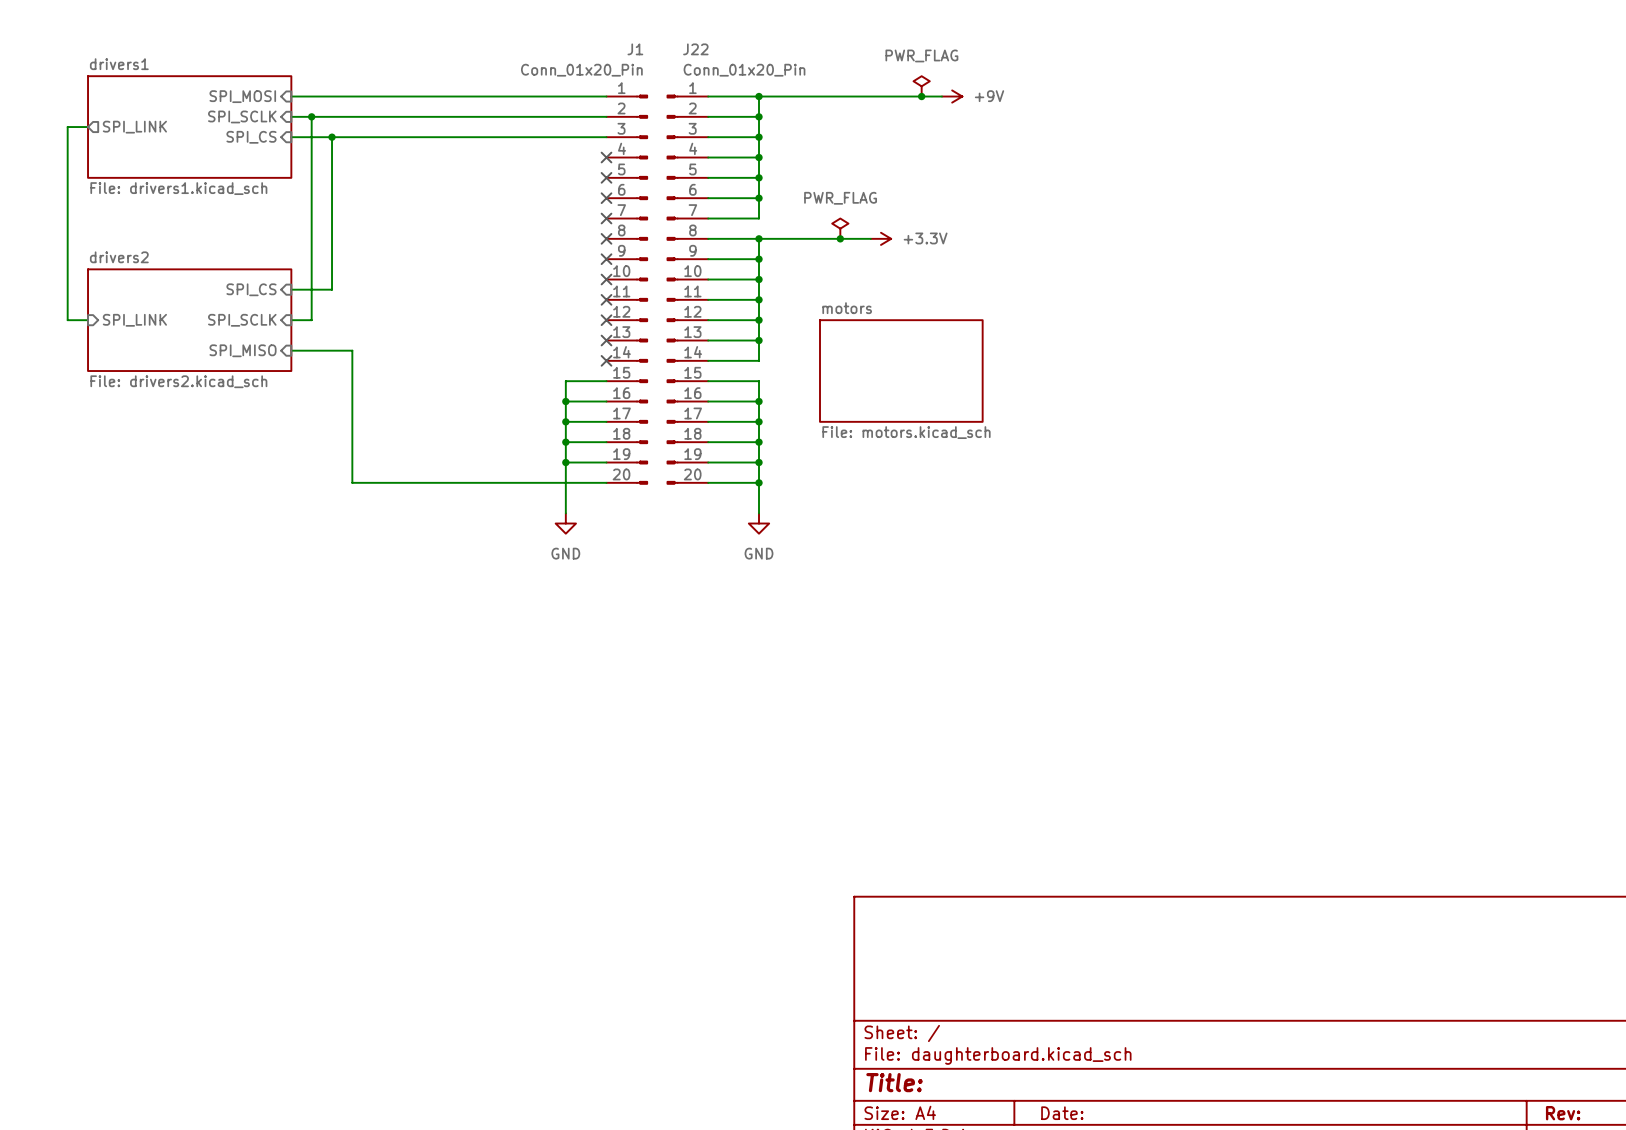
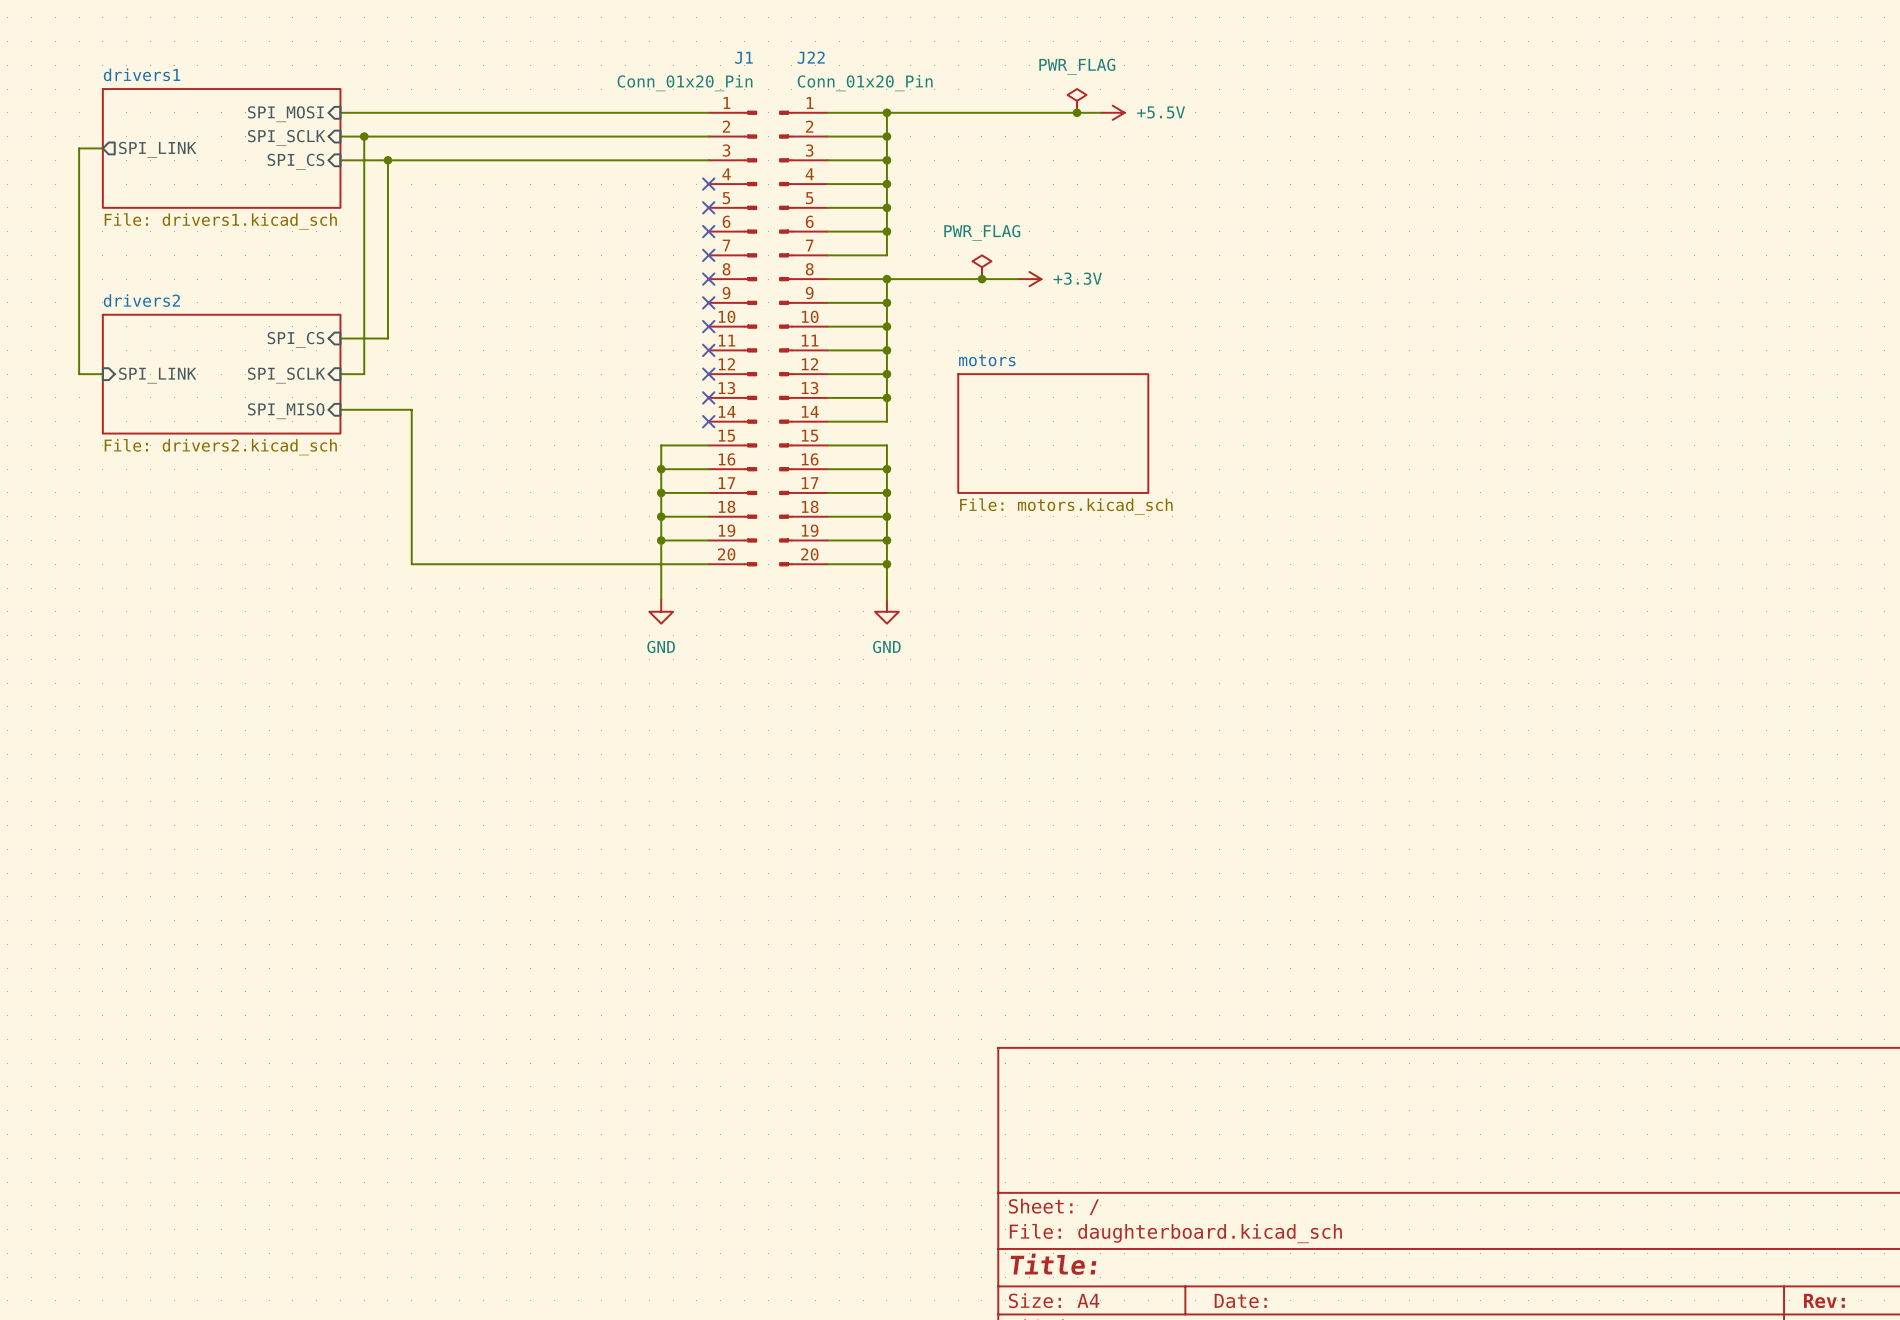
power symbol: +9V (952, 96) -> +5.5V (1112, 112)

